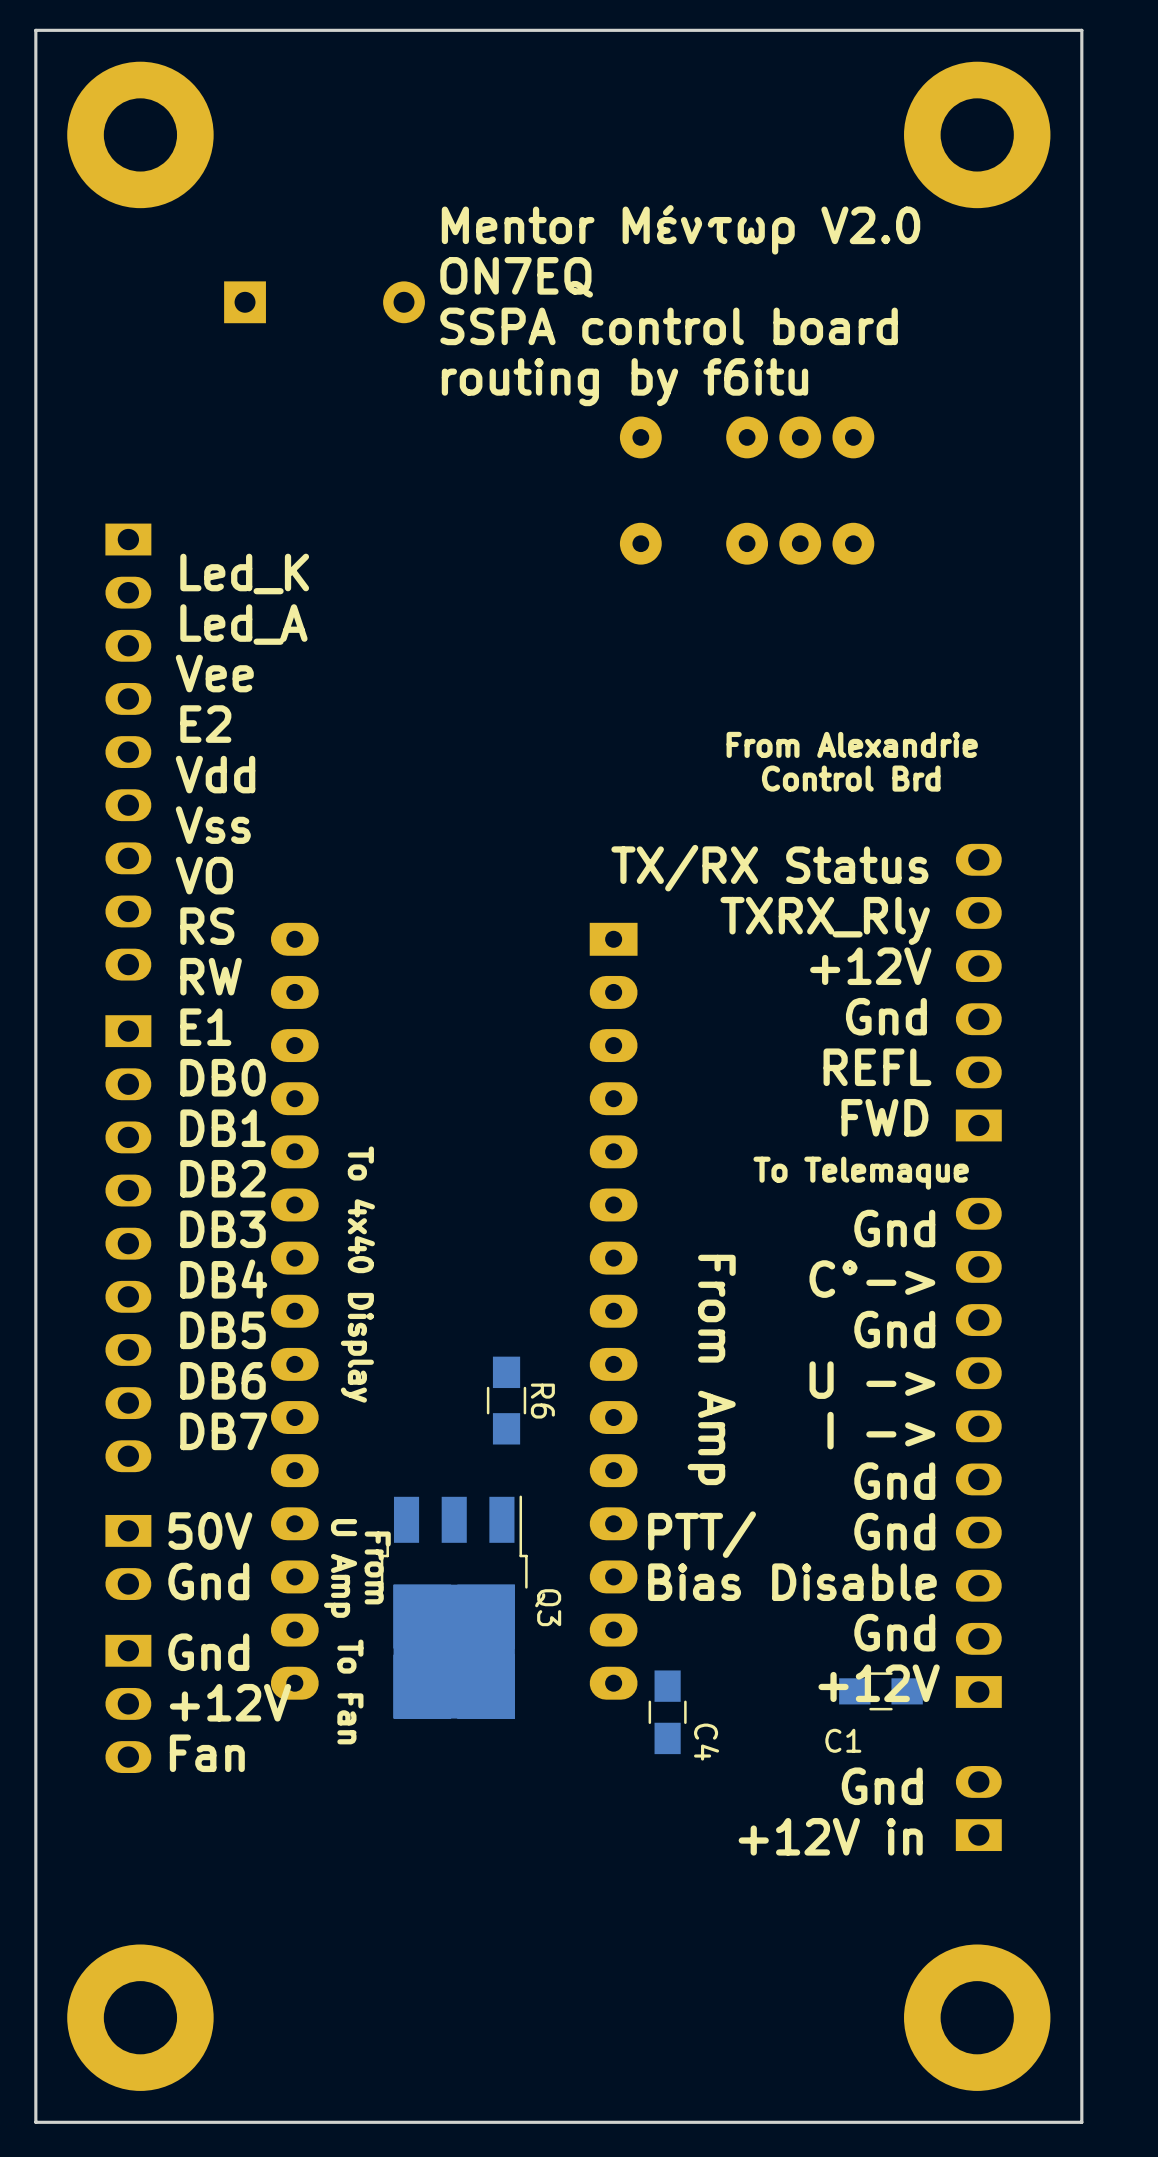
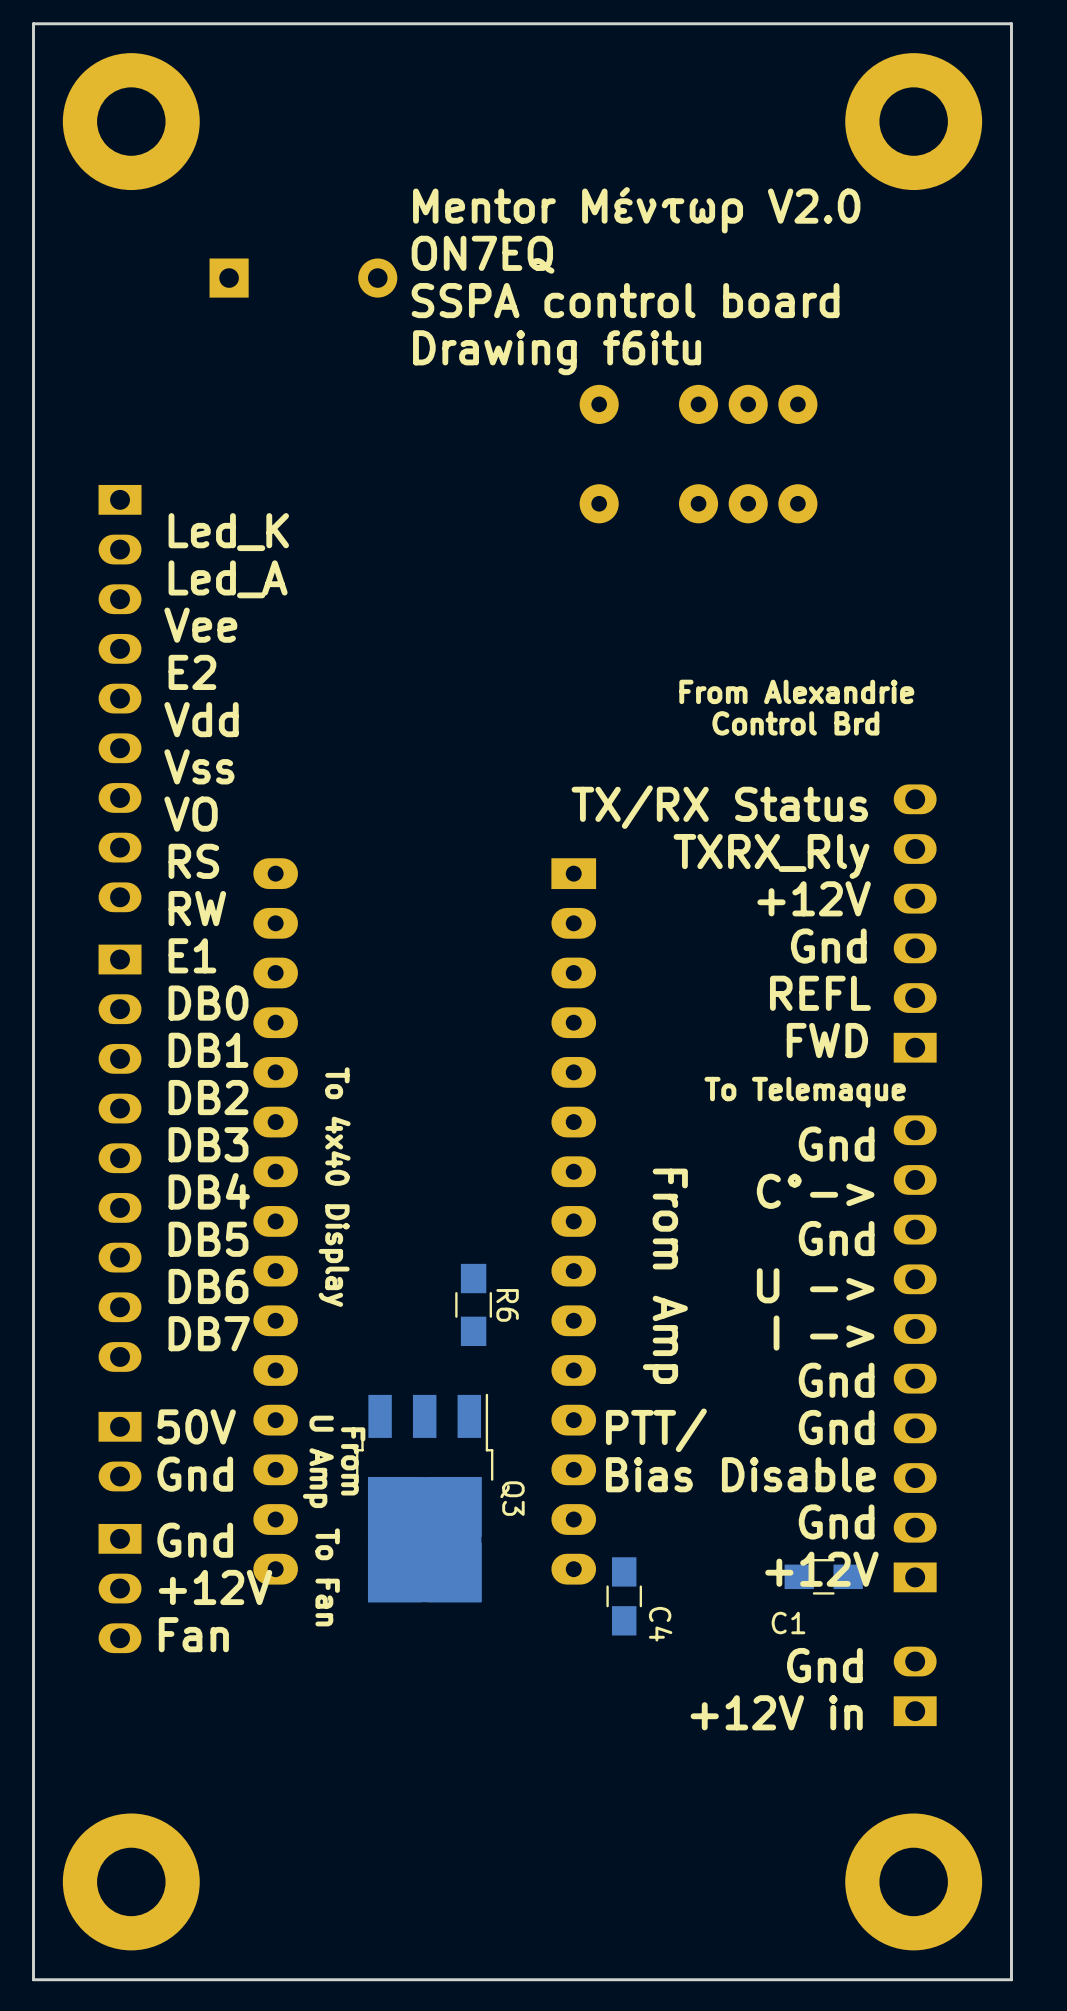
text: routing by f6itu (624, 382) -> Drawing f6itu (557, 352)

